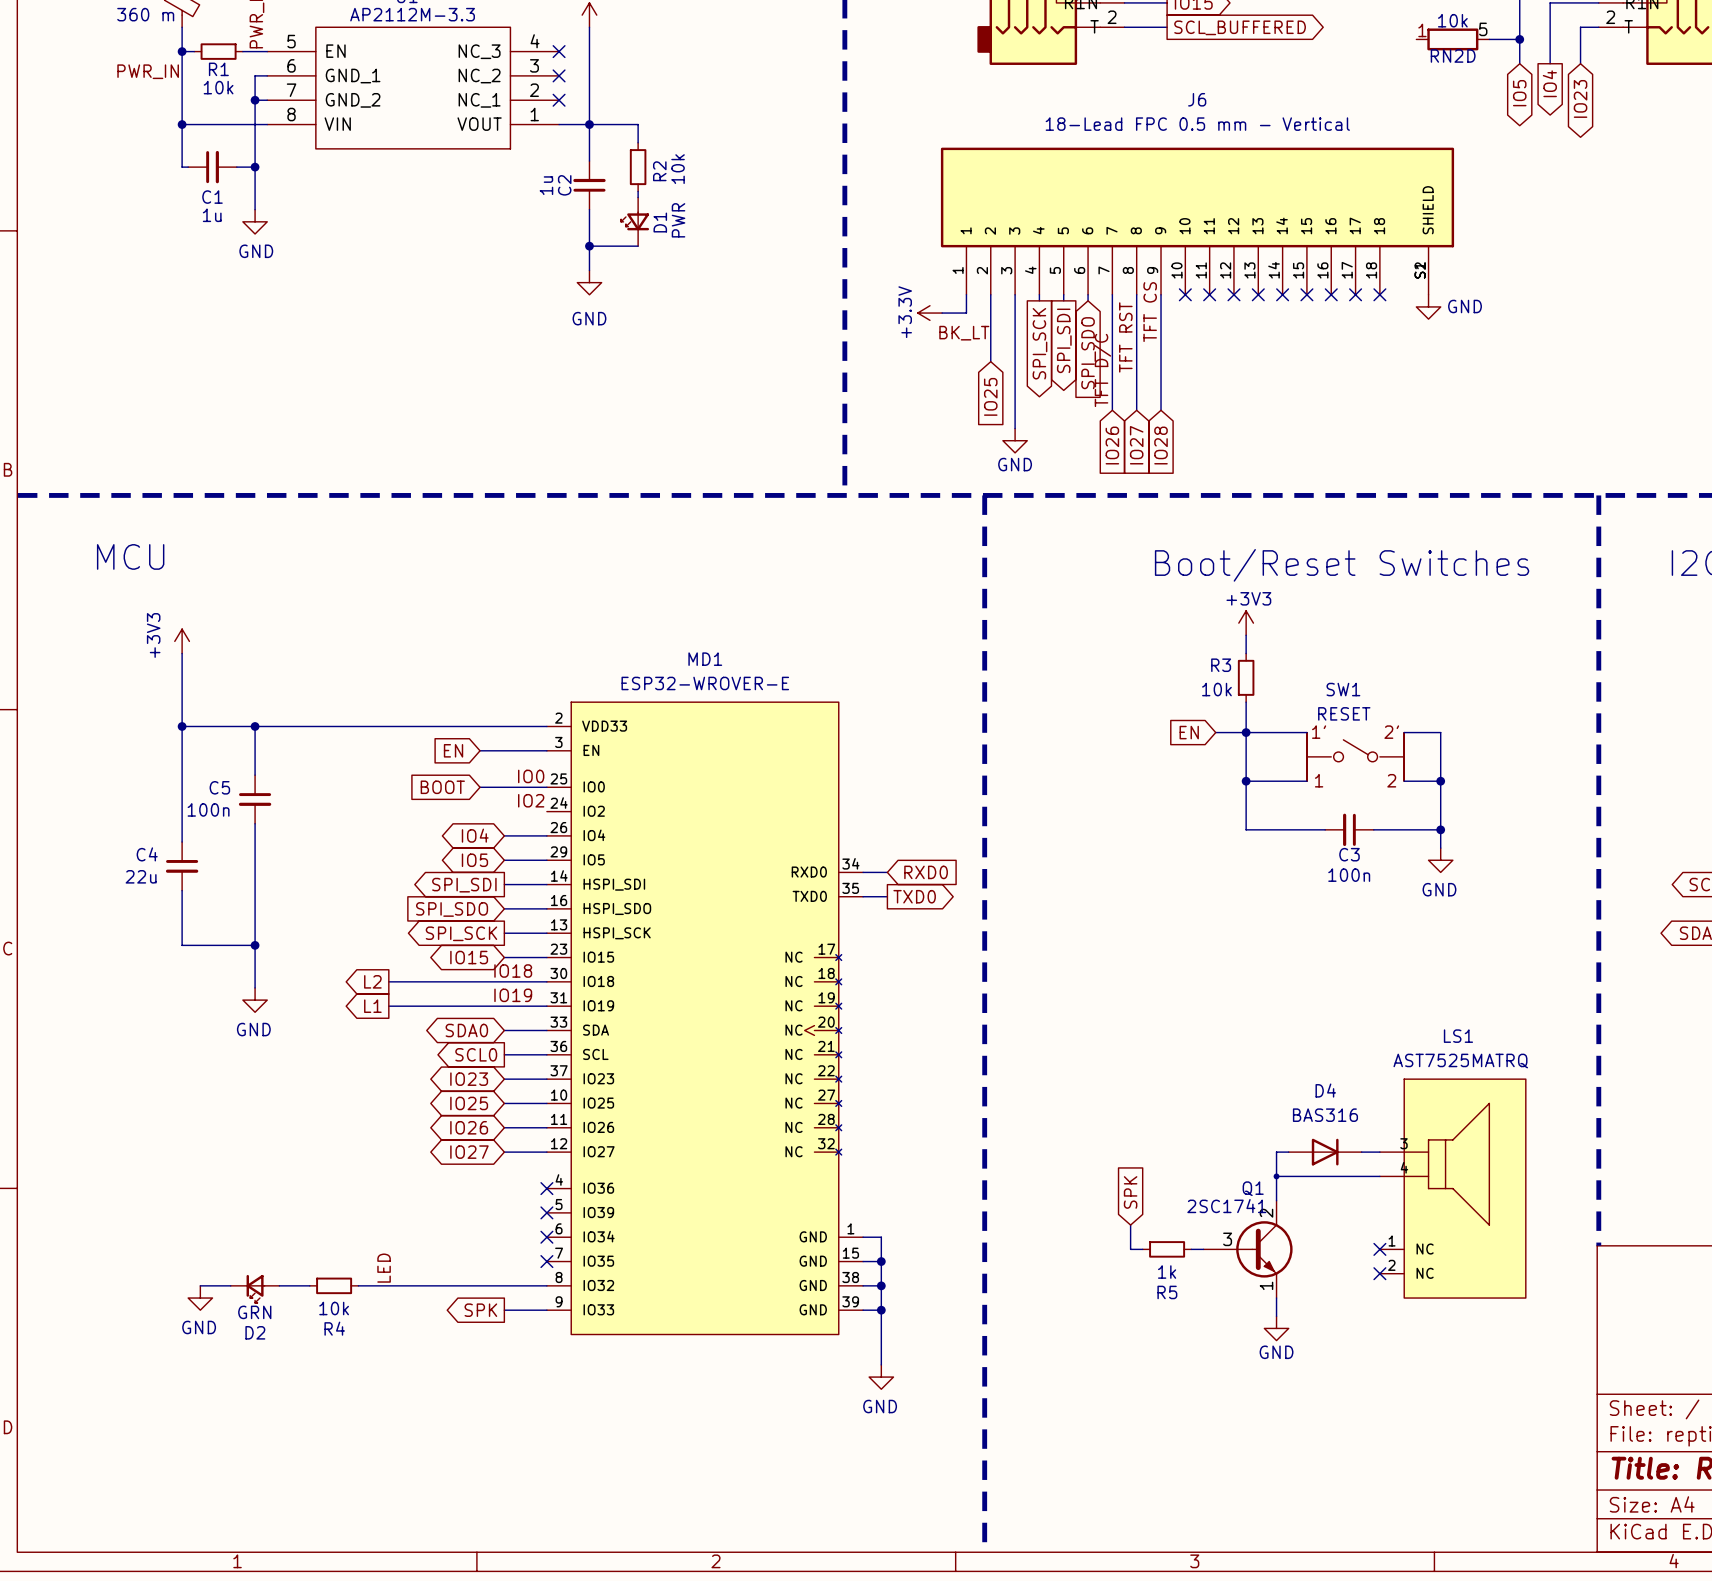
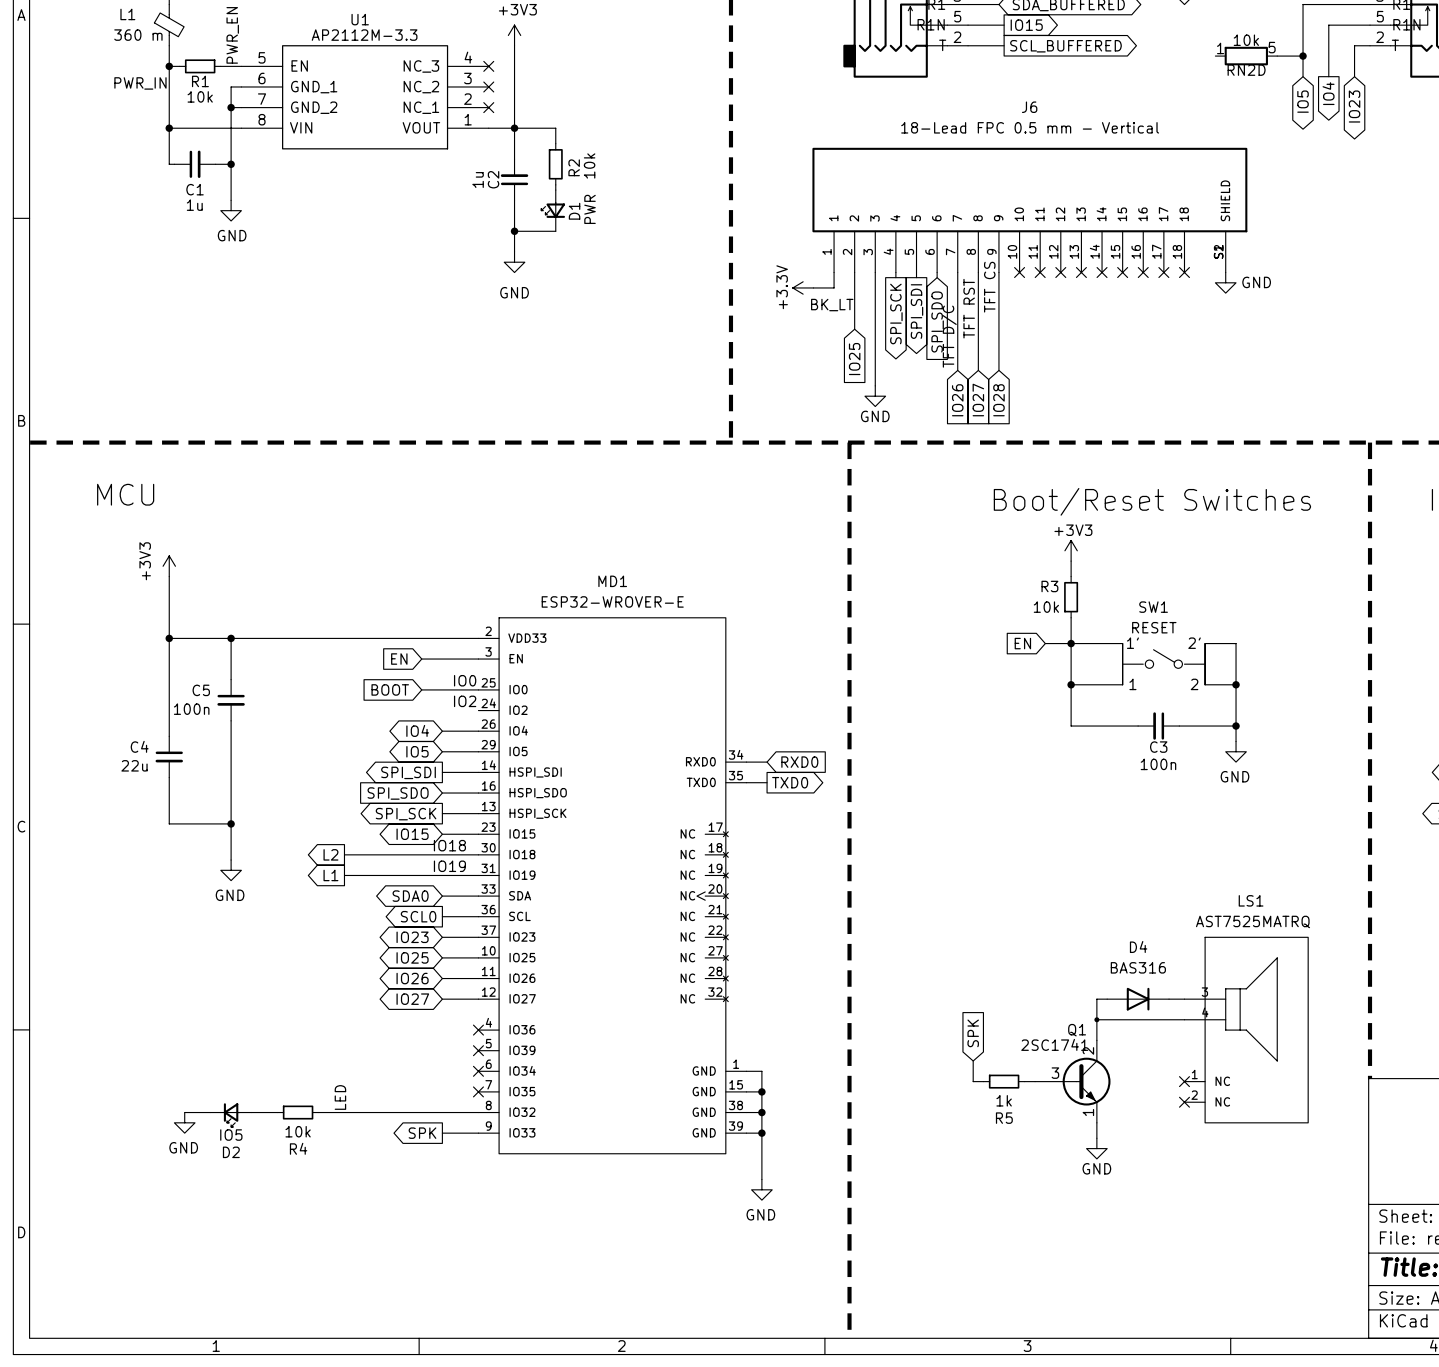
D2 value: GRN (254, 1312) -> IO5 (231, 1135)

